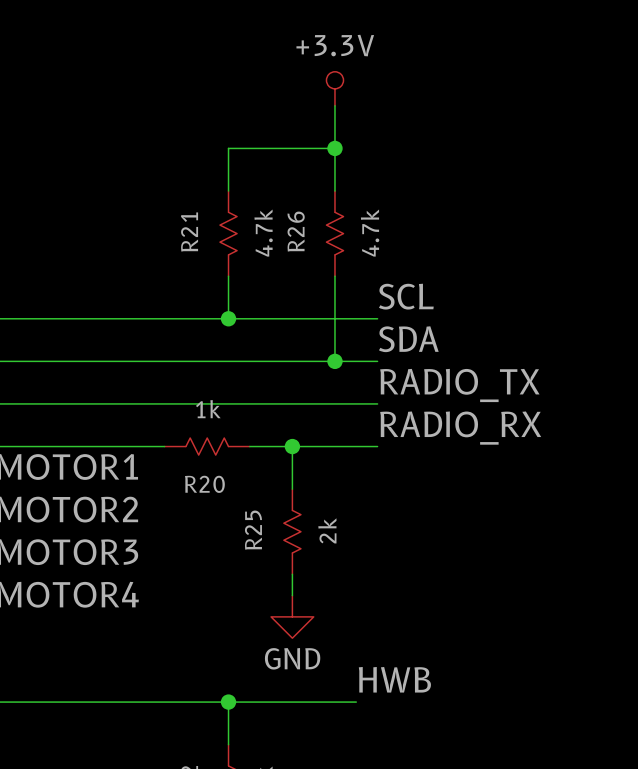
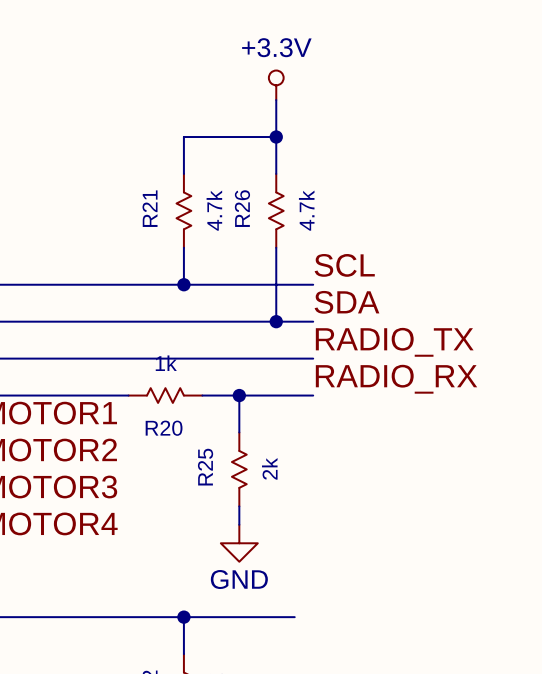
label: HWB (394, 679) -> none

